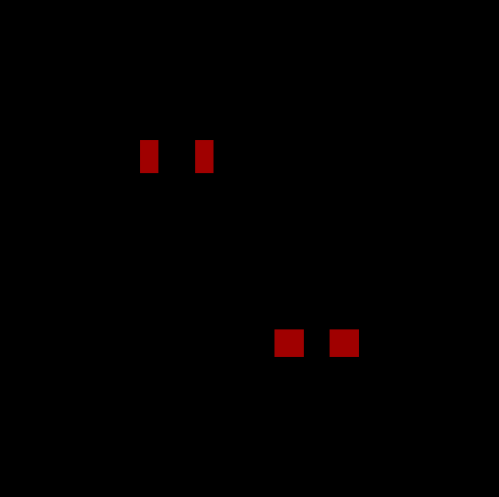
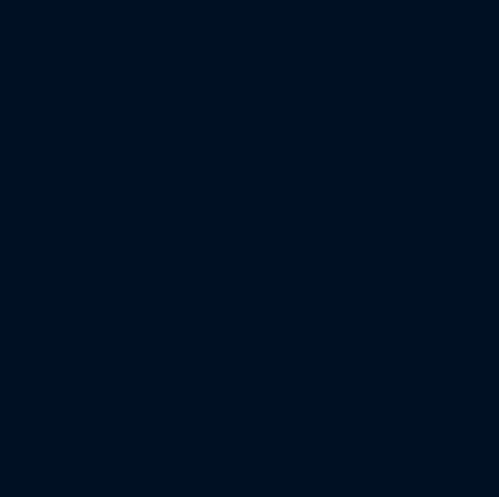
part: (176, 156) -> none
part: (316, 343) -> none

